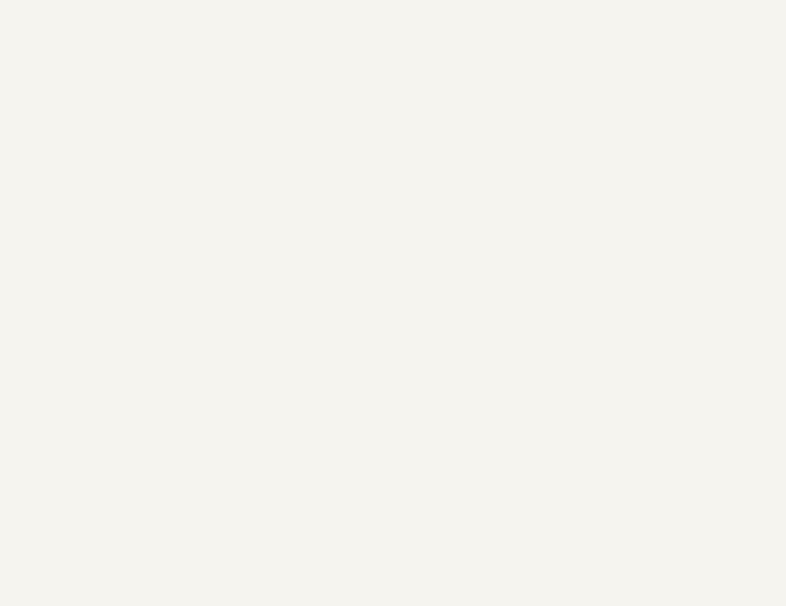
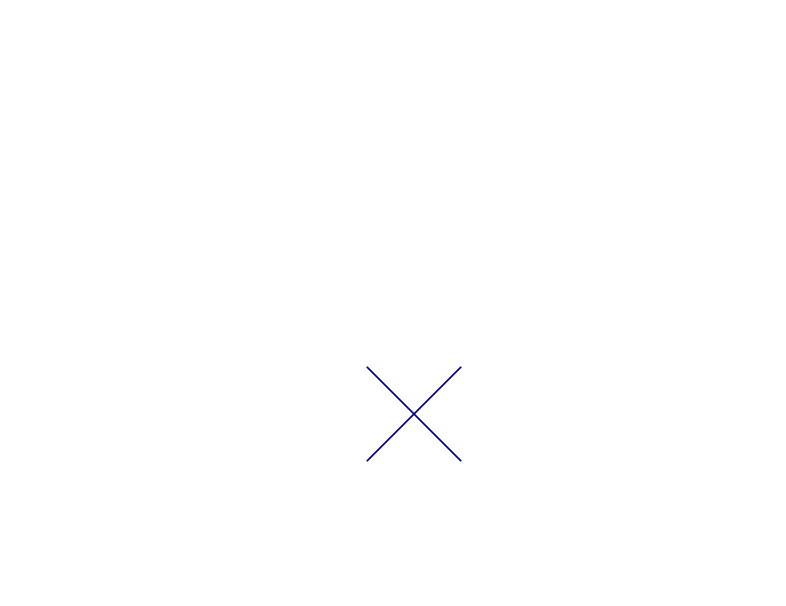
no-connect mark: none -> (414, 414)

